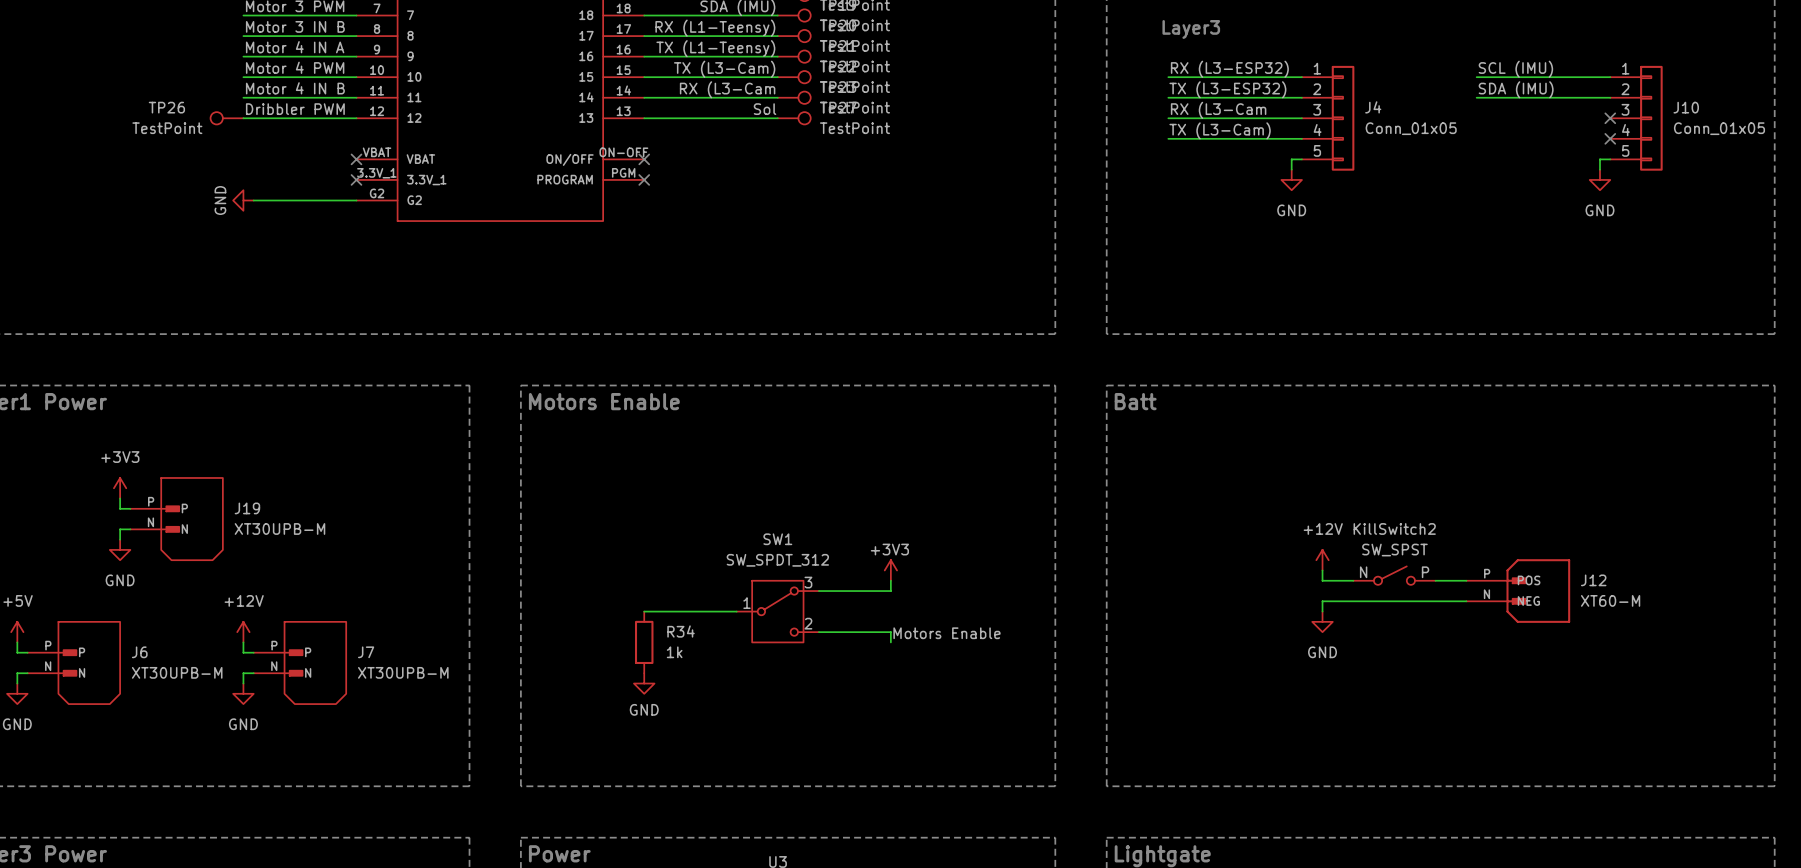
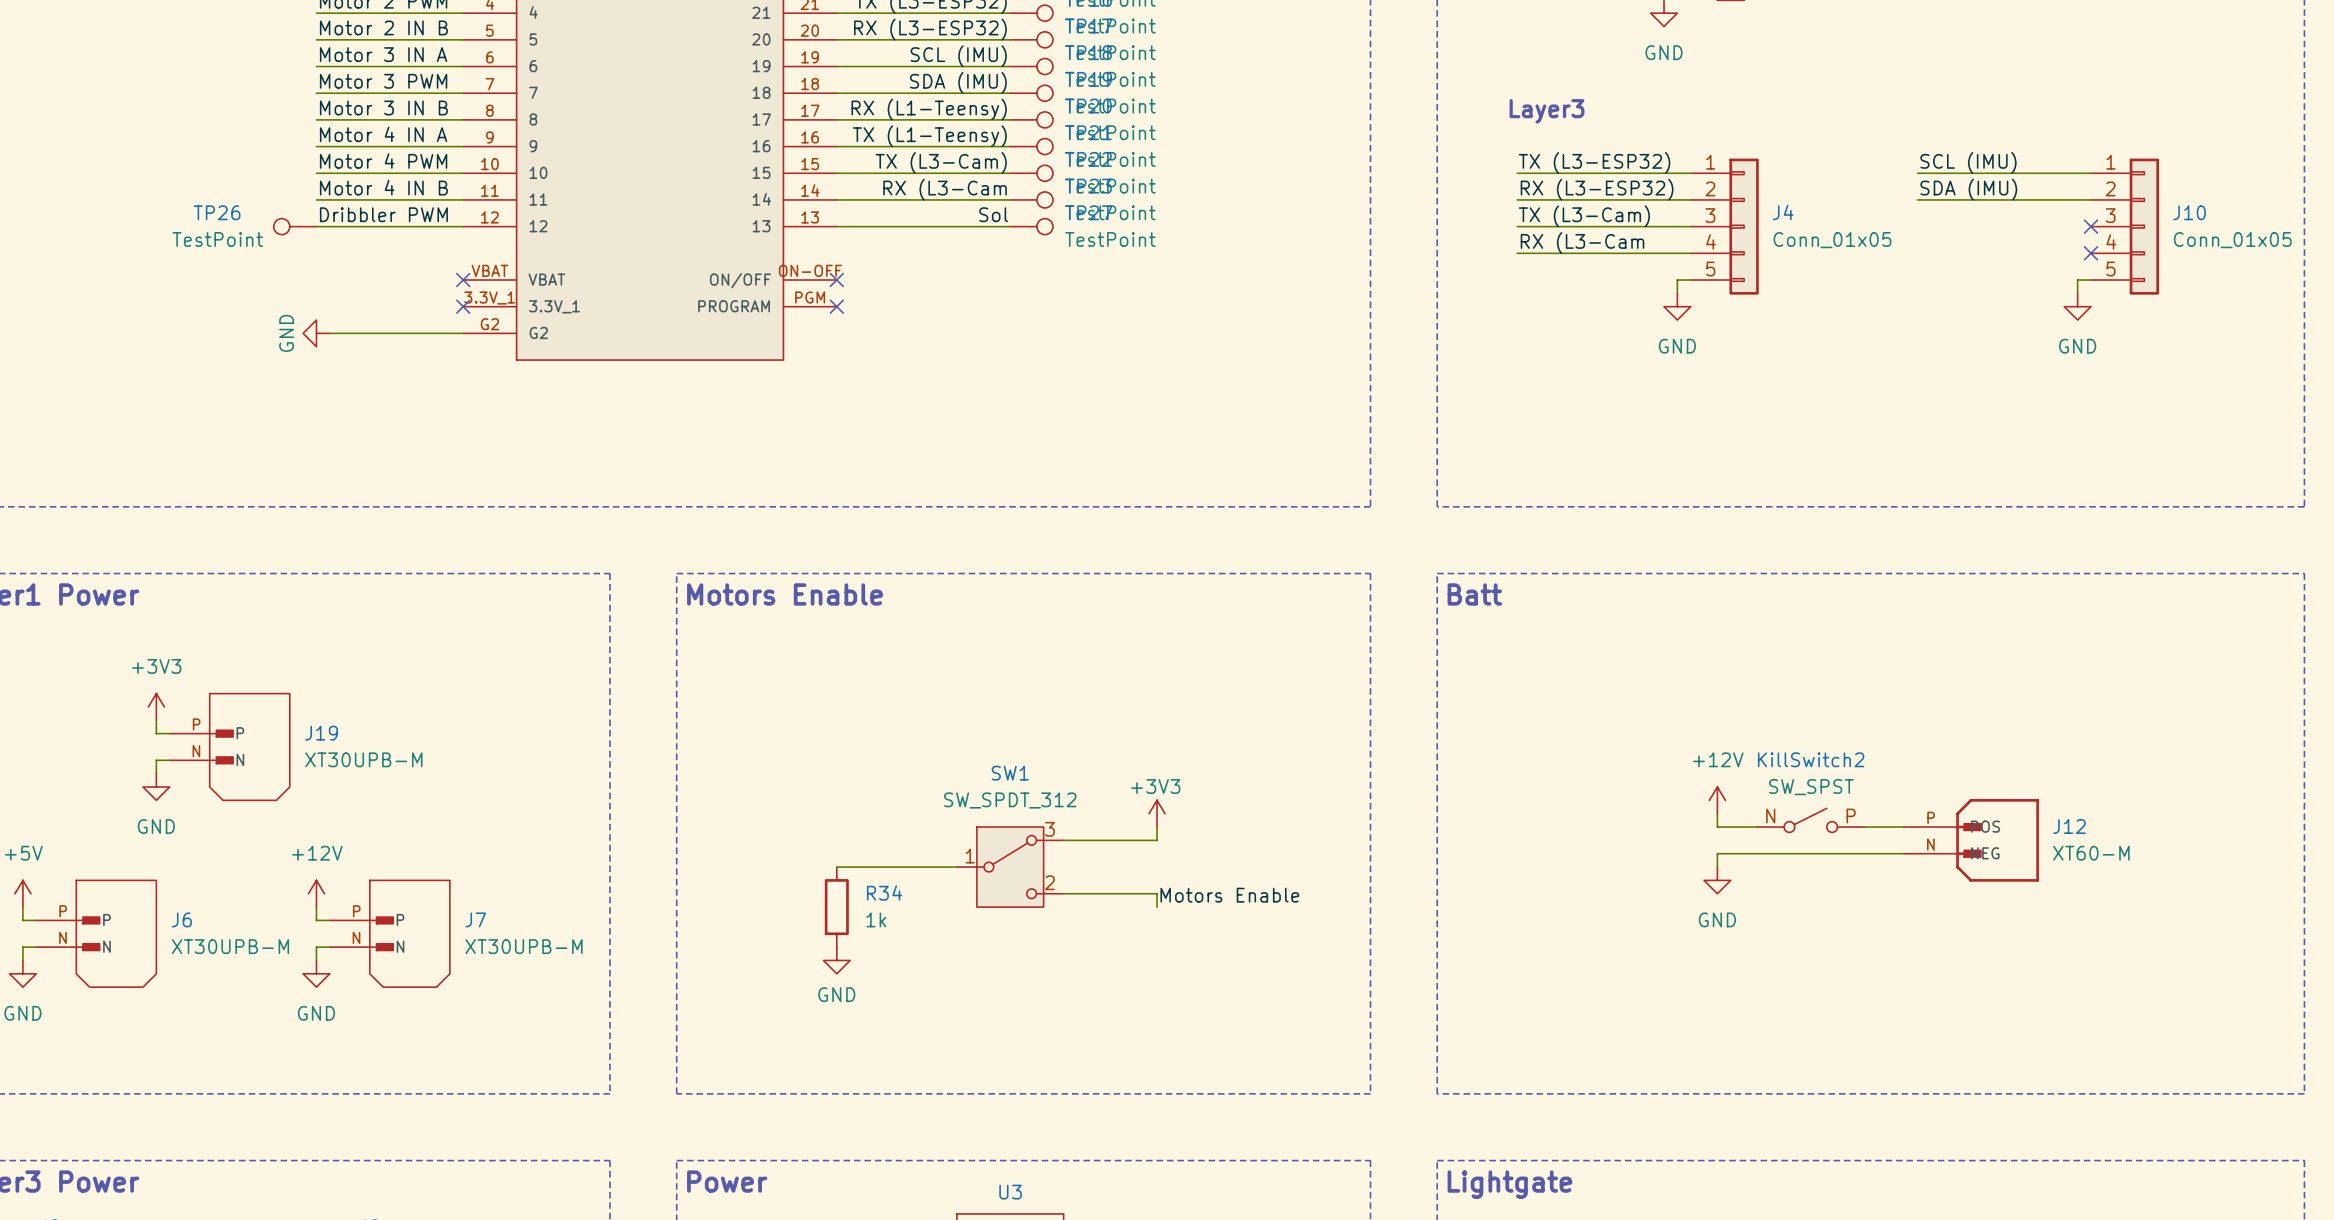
label: RX (L3-ESP32) (1229, 69) -> TX (L3-ESP32) (1594, 162)
label: TX (L3-ESP32) (1227, 89) -> RX (L3-ESP32) (1597, 189)
label: RX (L3-Cam (1218, 110) -> TX (L3-Cam) (1584, 216)
label: TX (L3-Cam) (1220, 130) -> RX (L3-Cam (1582, 243)

